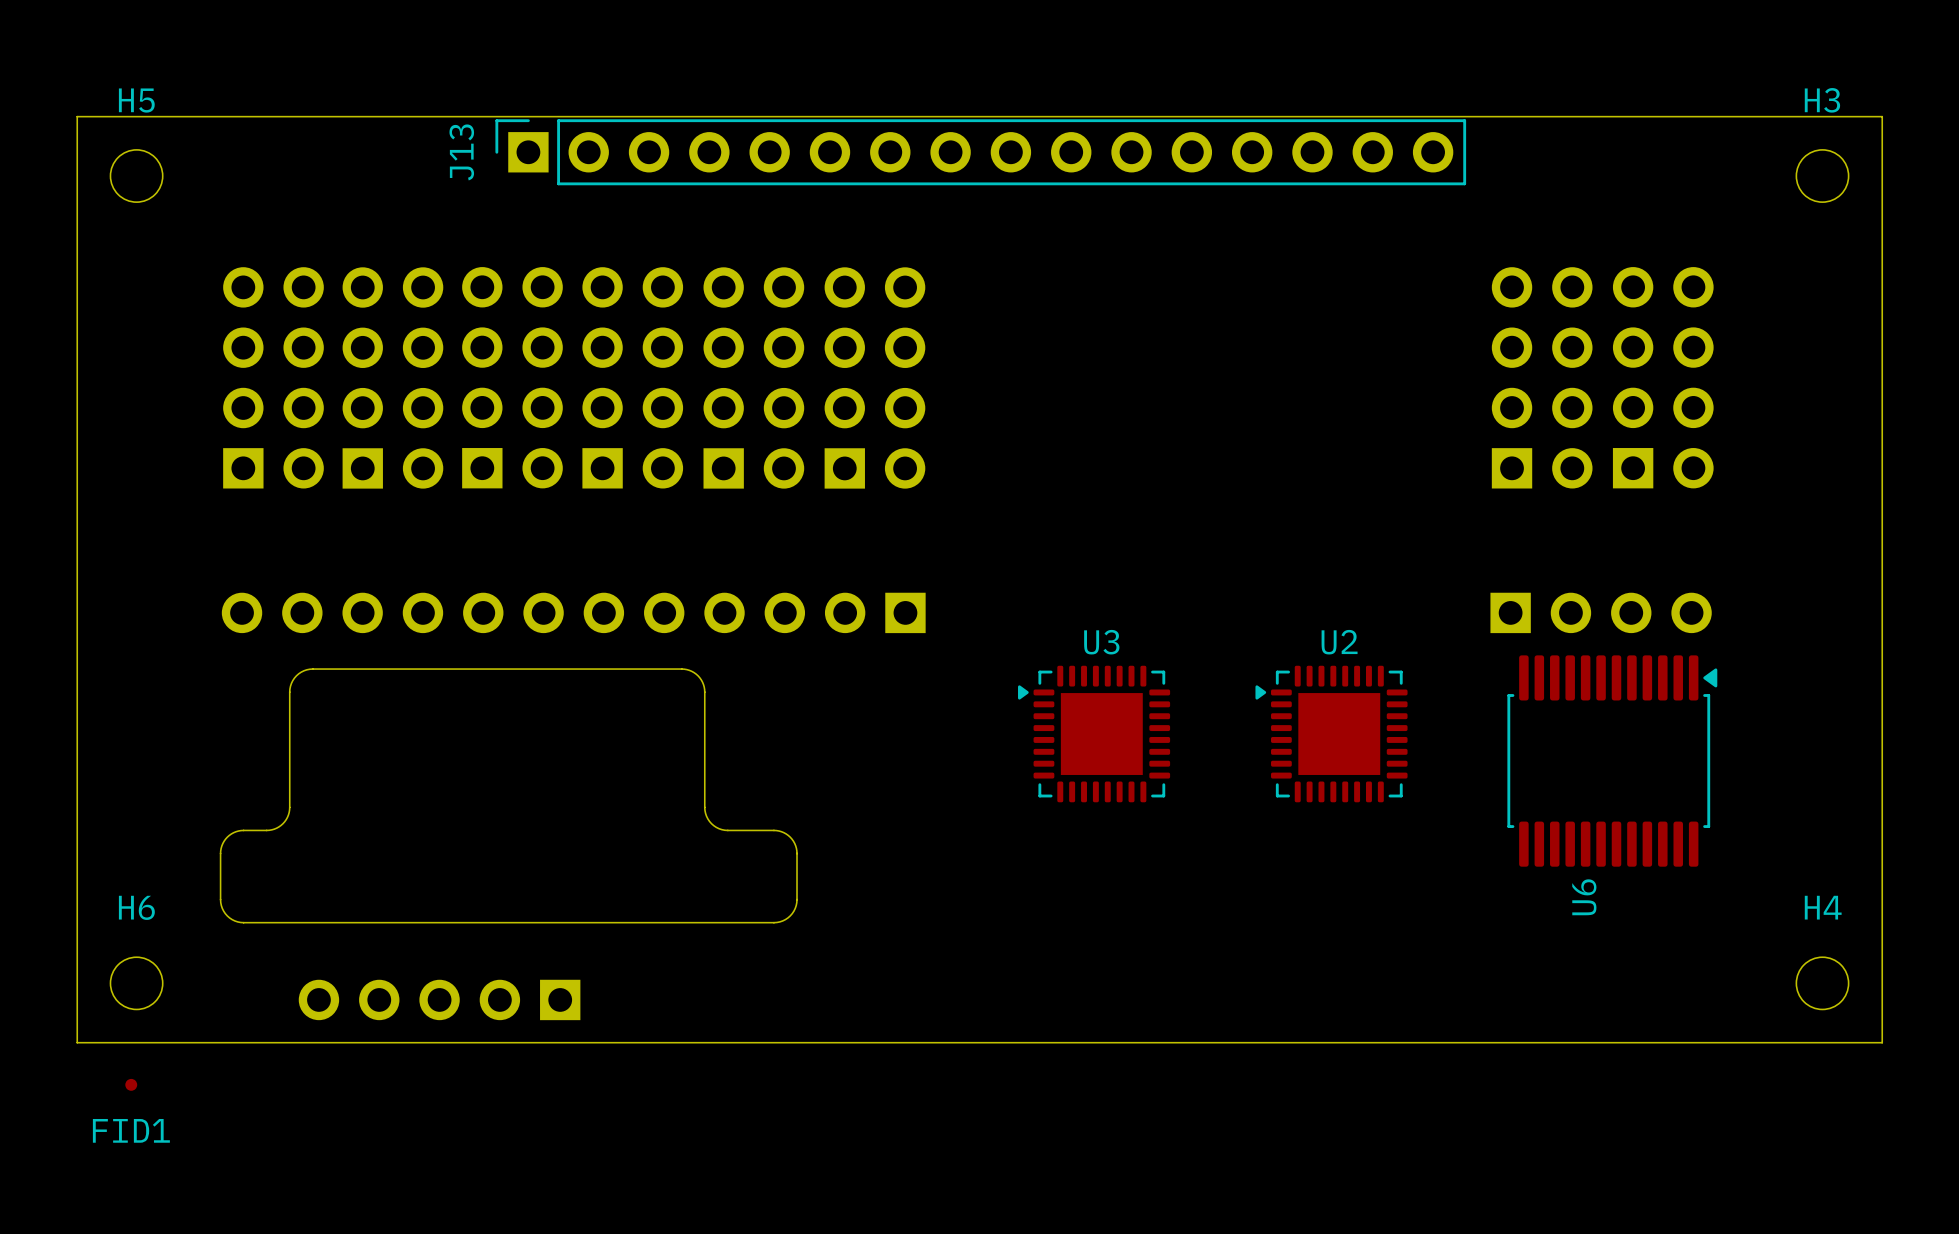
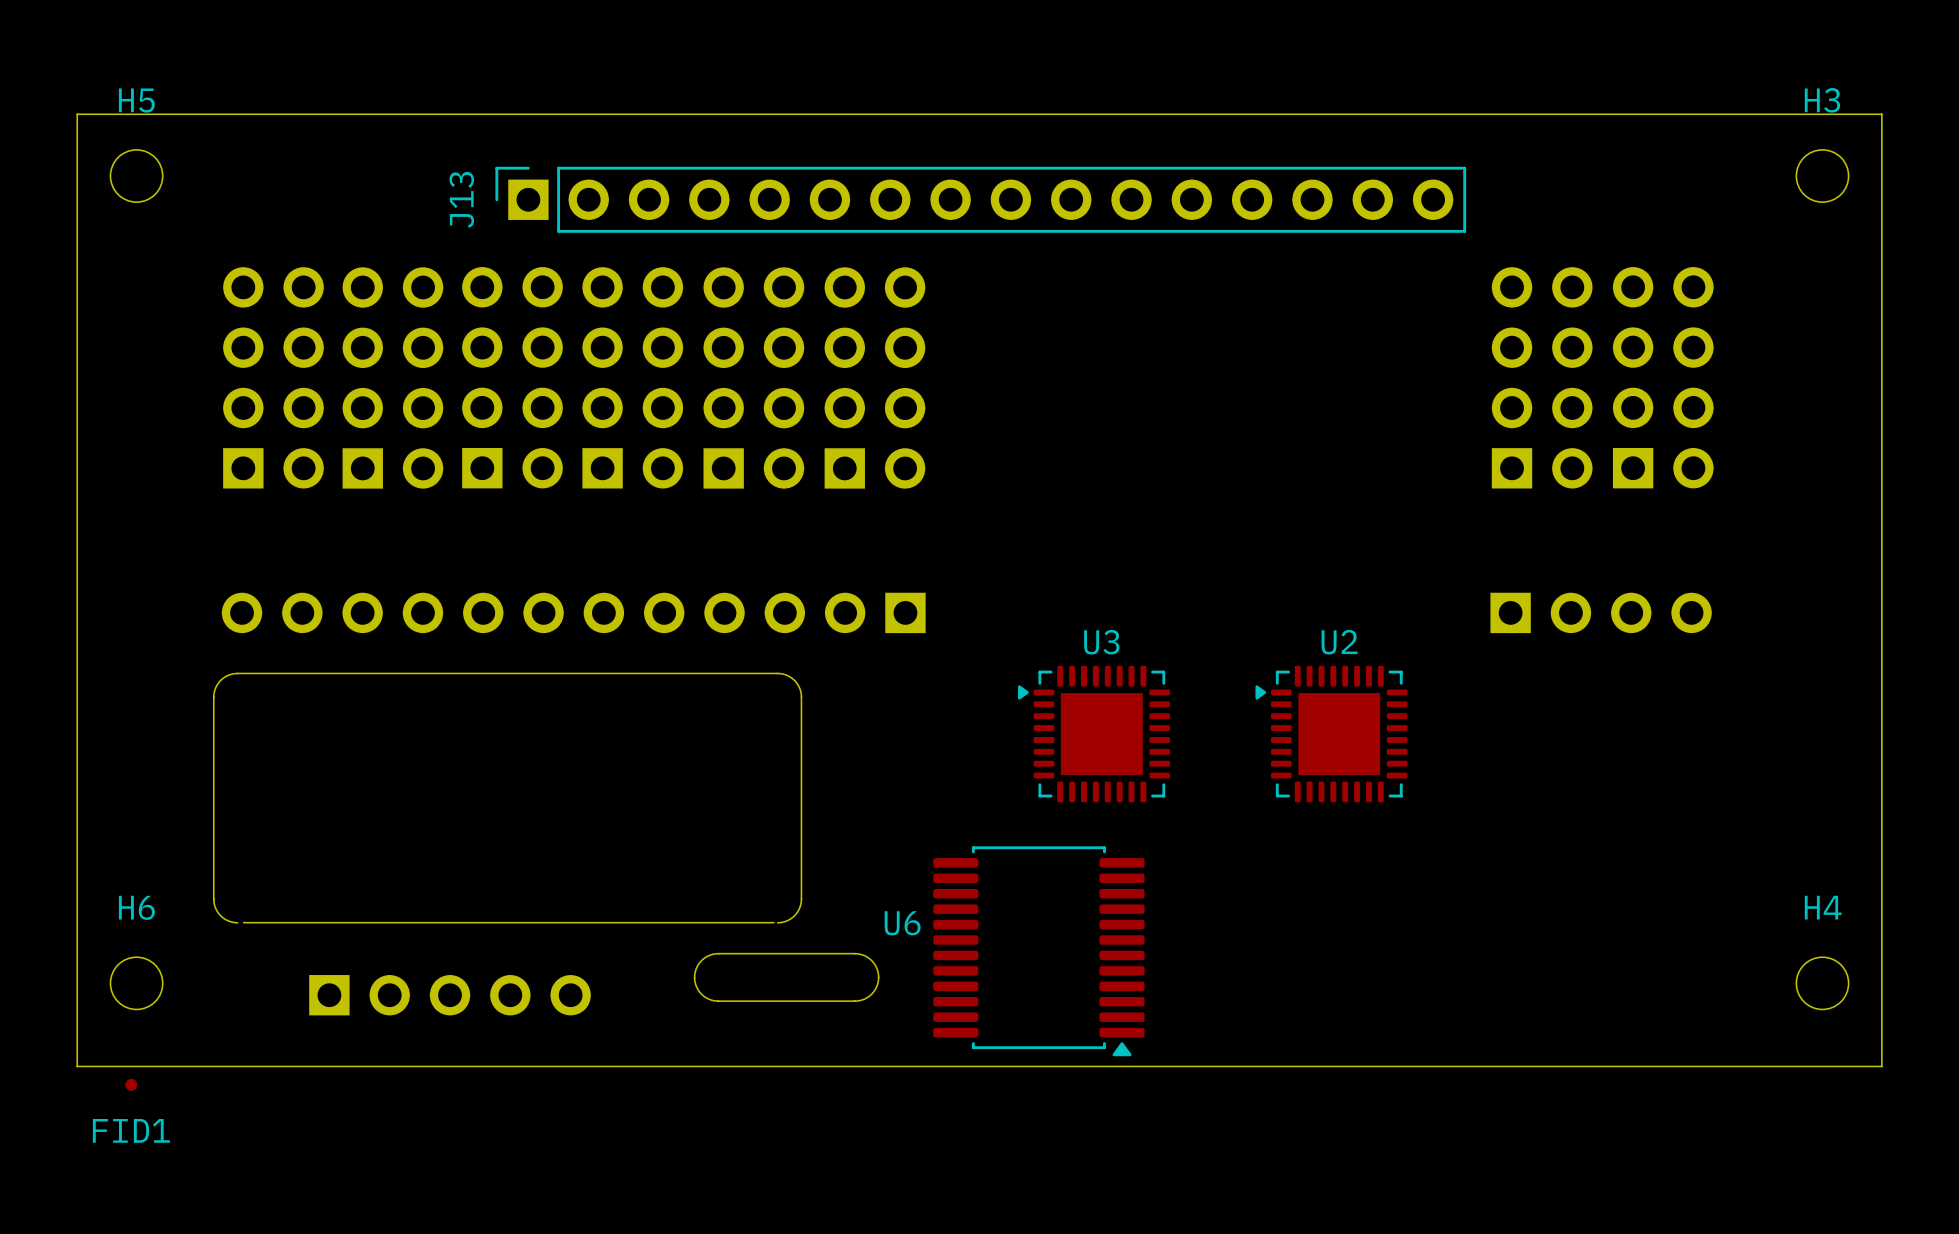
board edge: (77, 116) (1882, 116) (1882, 1042) (77, 1042) -> (77, 116) (77, 114) (1881, 114) (1881, 1066) (77, 1066) (77, 1042)
J13 position: (980, 152) -> (980, 199)
U6 rotation: 0° (1612, 761) -> 90° clockwise (1038, 951)
U6 position: (1612, 761) -> (1038, 951)
board edge: none -> (237, 922) (227, 920) (220, 915) (216, 909) (213, 899) (213, 694) (217, 684) (222, 678) (237, 673) (777, 673) (788, 675) (796, 682) (801, 694) (801, 899) (800, 906) (794, 915) (785, 921) (777, 922)
board edge: (243, 922) (229, 917) (221, 905) (221, 848) (225, 839) (233, 832) (241, 830) (271, 829) (281, 825) (287, 817) (289, 807) (289, 689) (292, 680) (298, 673) (312, 669) (681, 669) (691, 671) (699, 677) (704, 689) (704, 807) (707, 818) (716, 827) (724, 830) (781, 831) (790, 837) (795, 845) (796, 905) (787, 917) (773, 922) -> none
board edge: none -> (718, 953) (860, 954) (869, 958) (874, 964) (878, 972) (878, 982) (871, 994) (857, 1001) (713, 1000) (699, 992) (695, 985) (694, 974) (698, 964) (703, 958) (718, 953)
part rotation: 0° (439, 999) -> 180° (450, 995)

